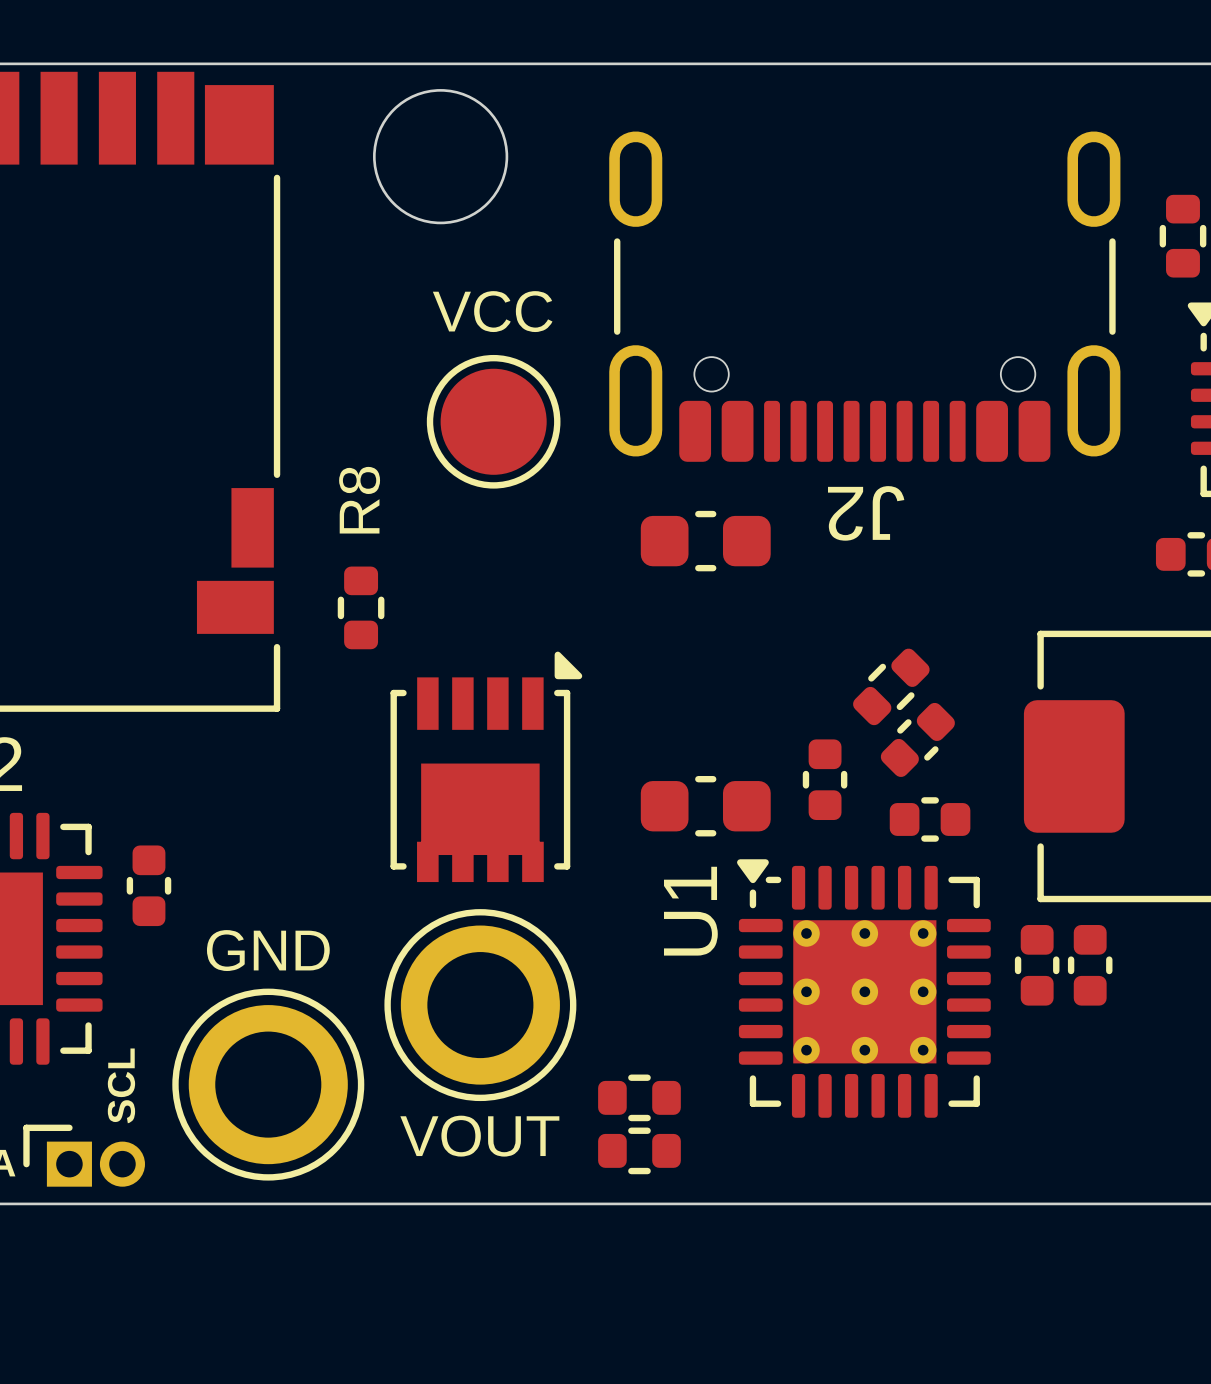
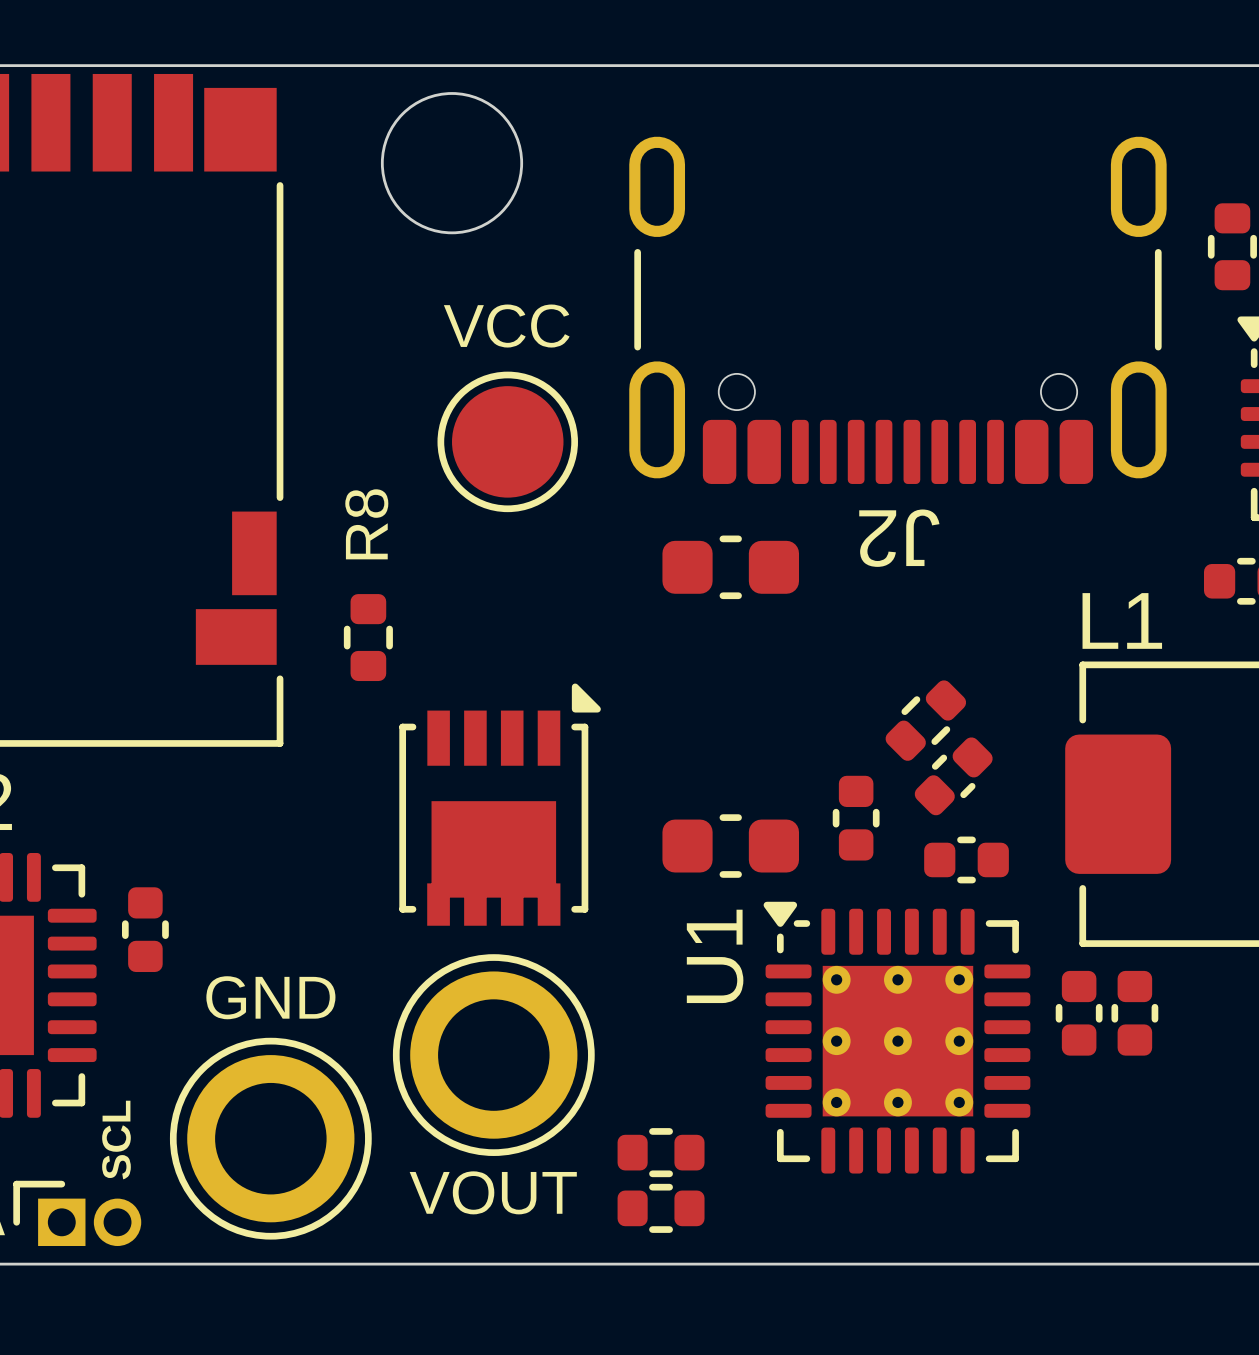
L1 name: none -> L1 (1122, 620)

